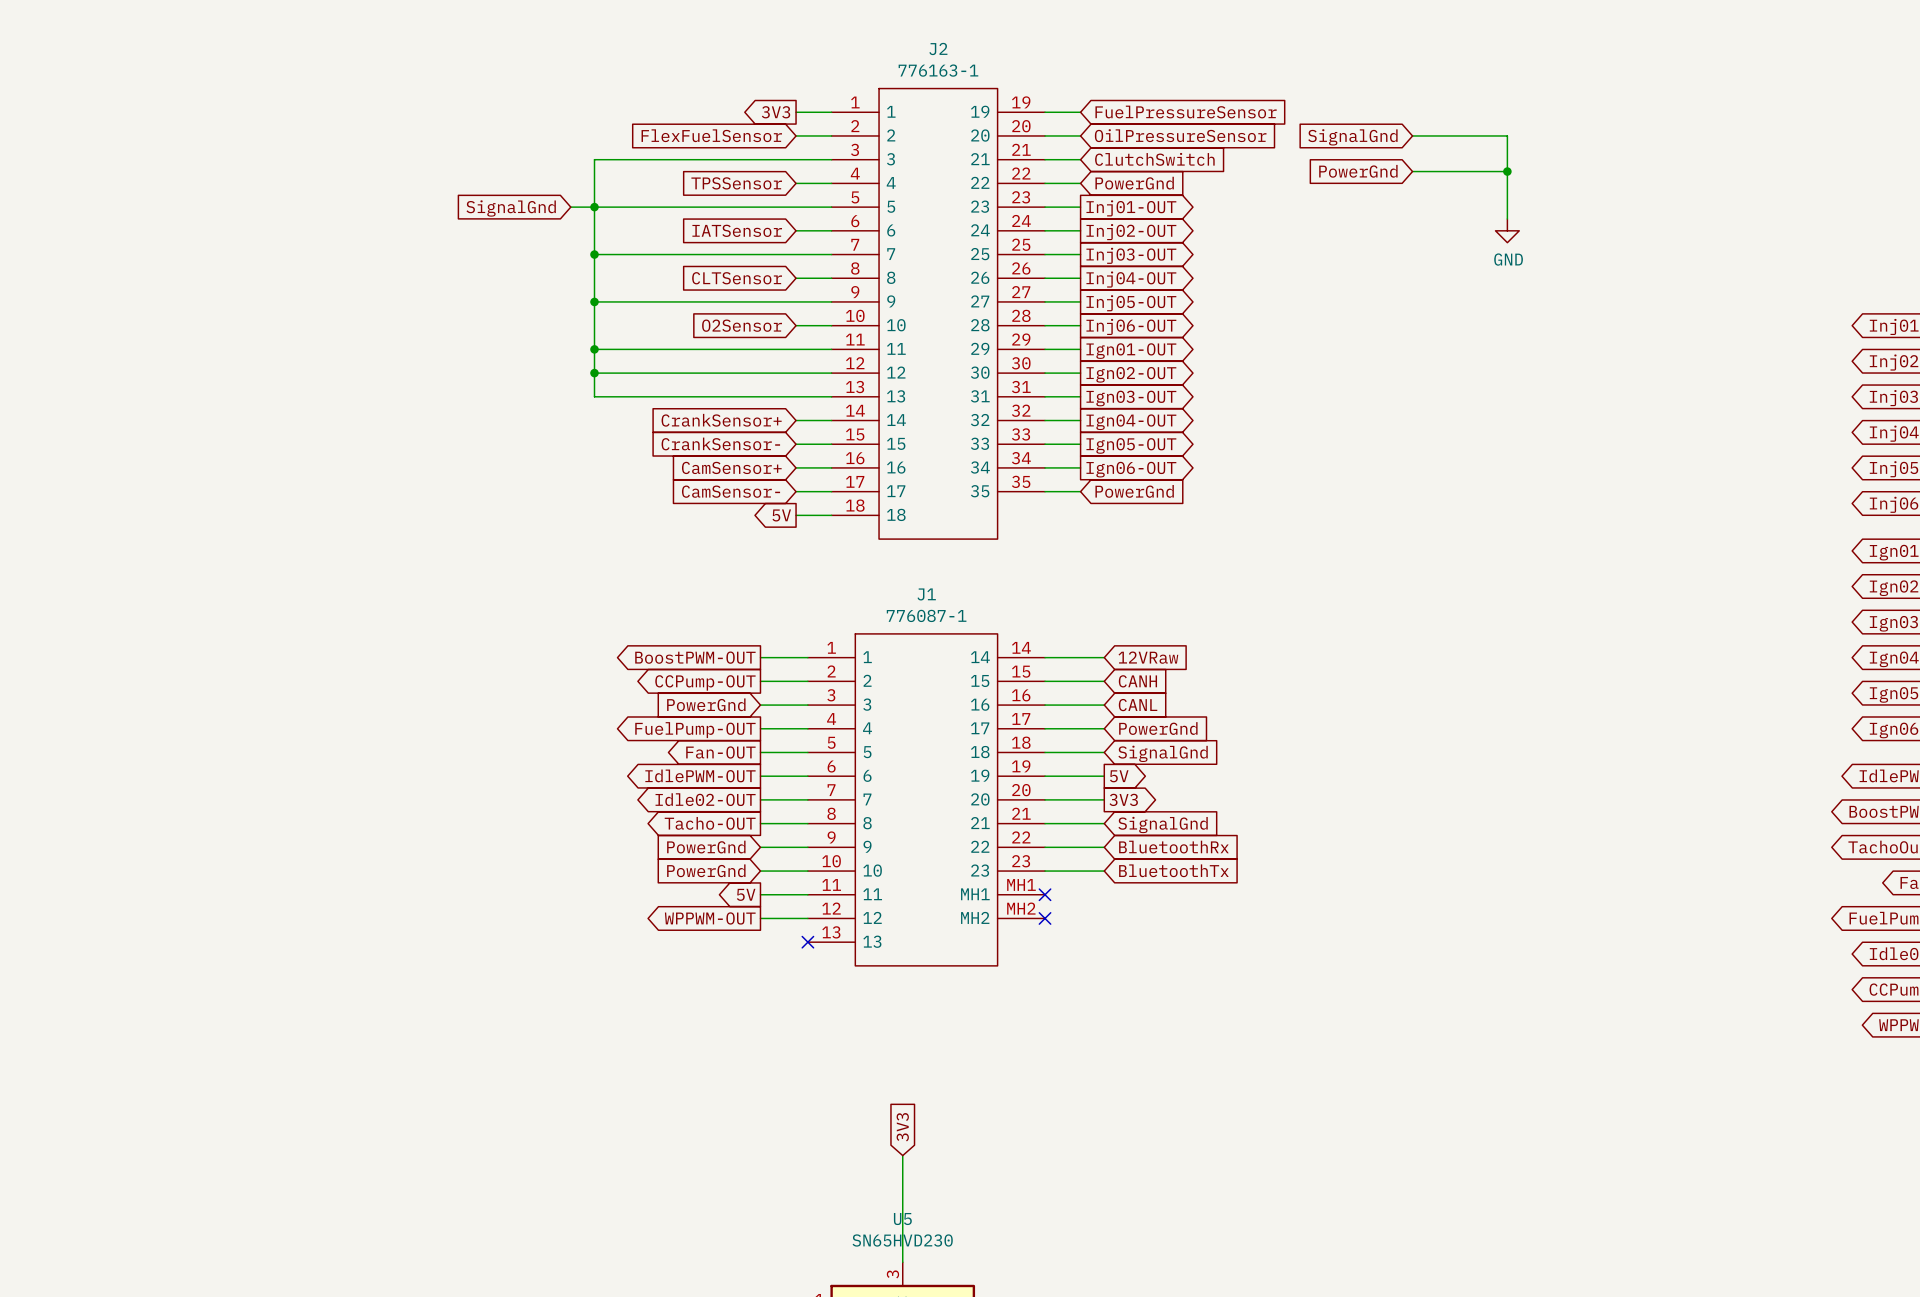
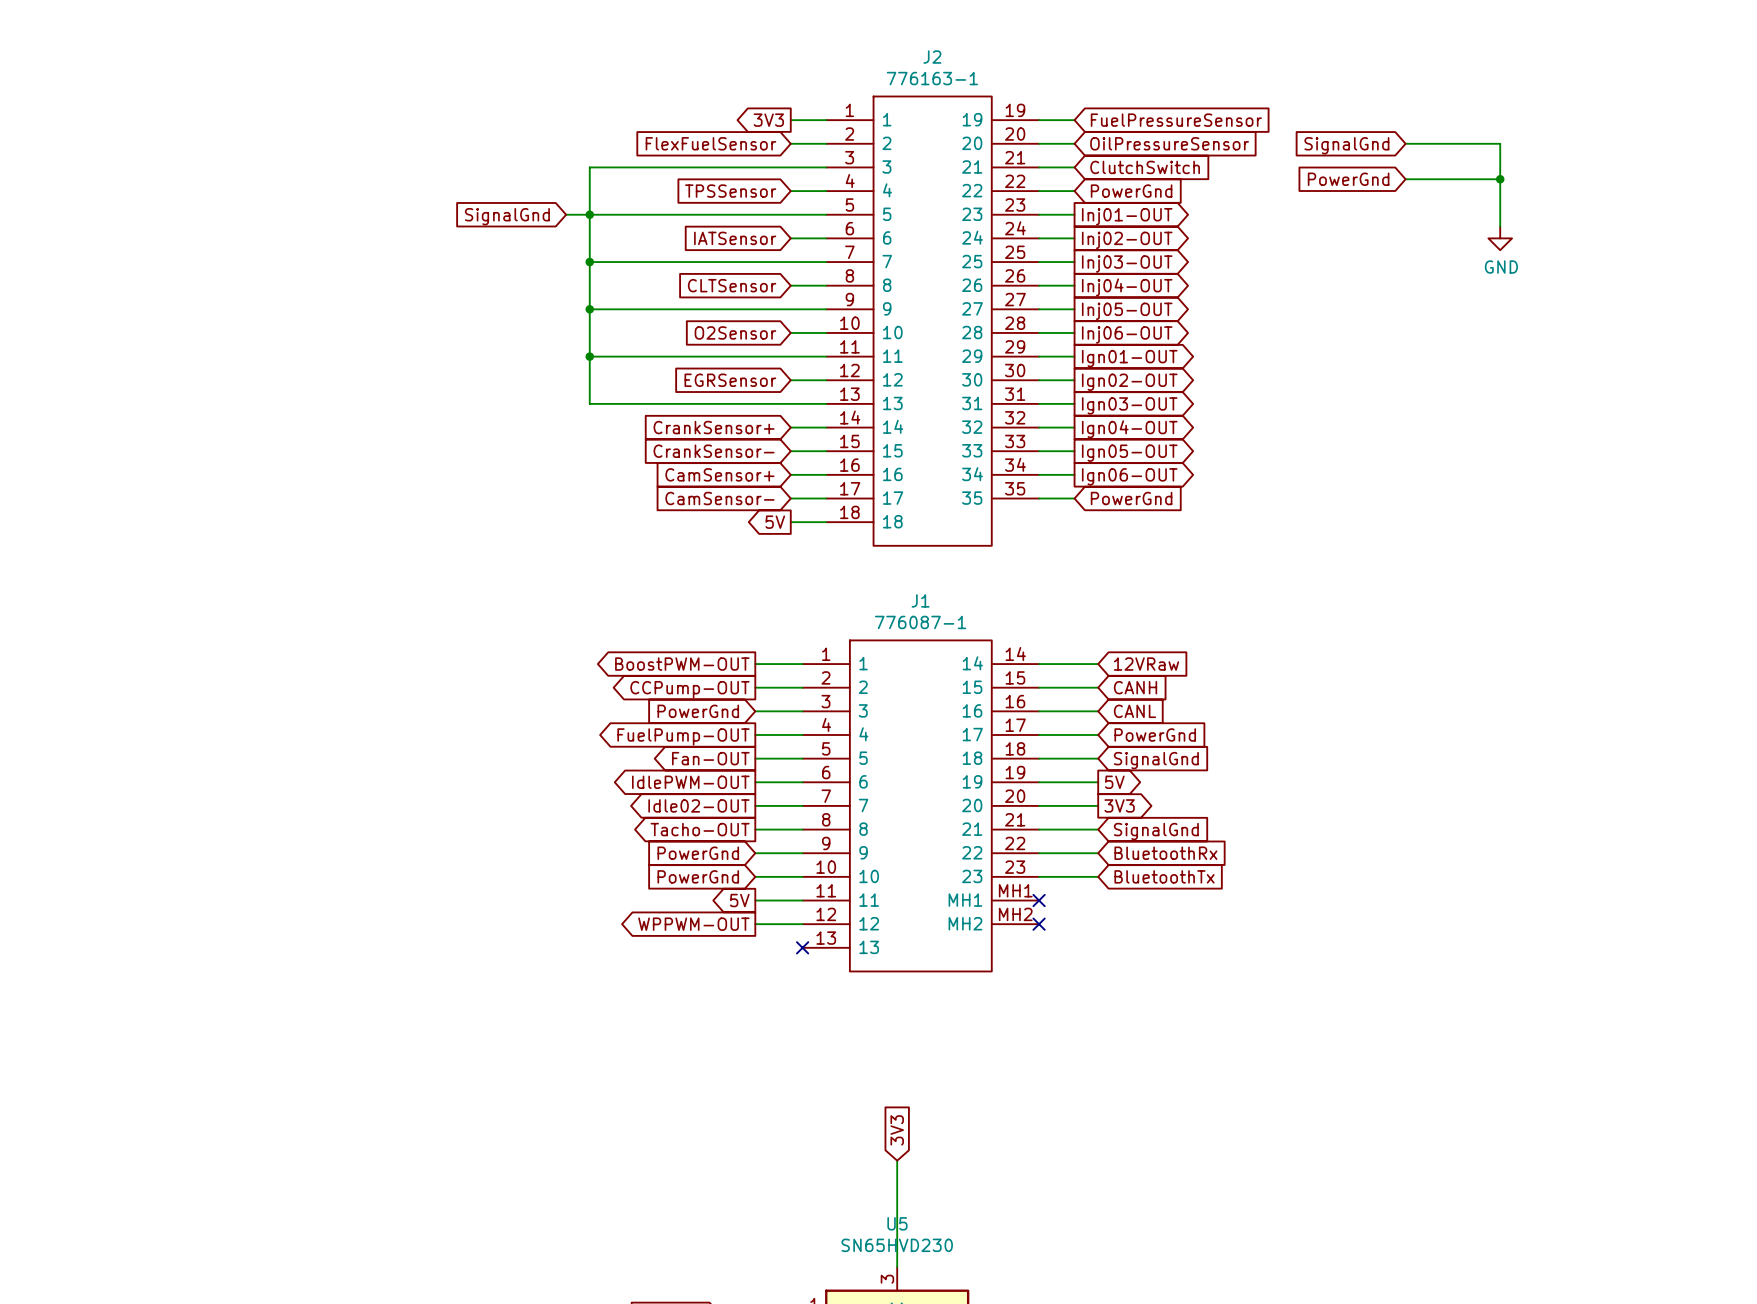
wire: (594, 373) (796, 373) -> none
junction: (594, 373) -> none
global label: none -> EGRSensor (730, 380)

